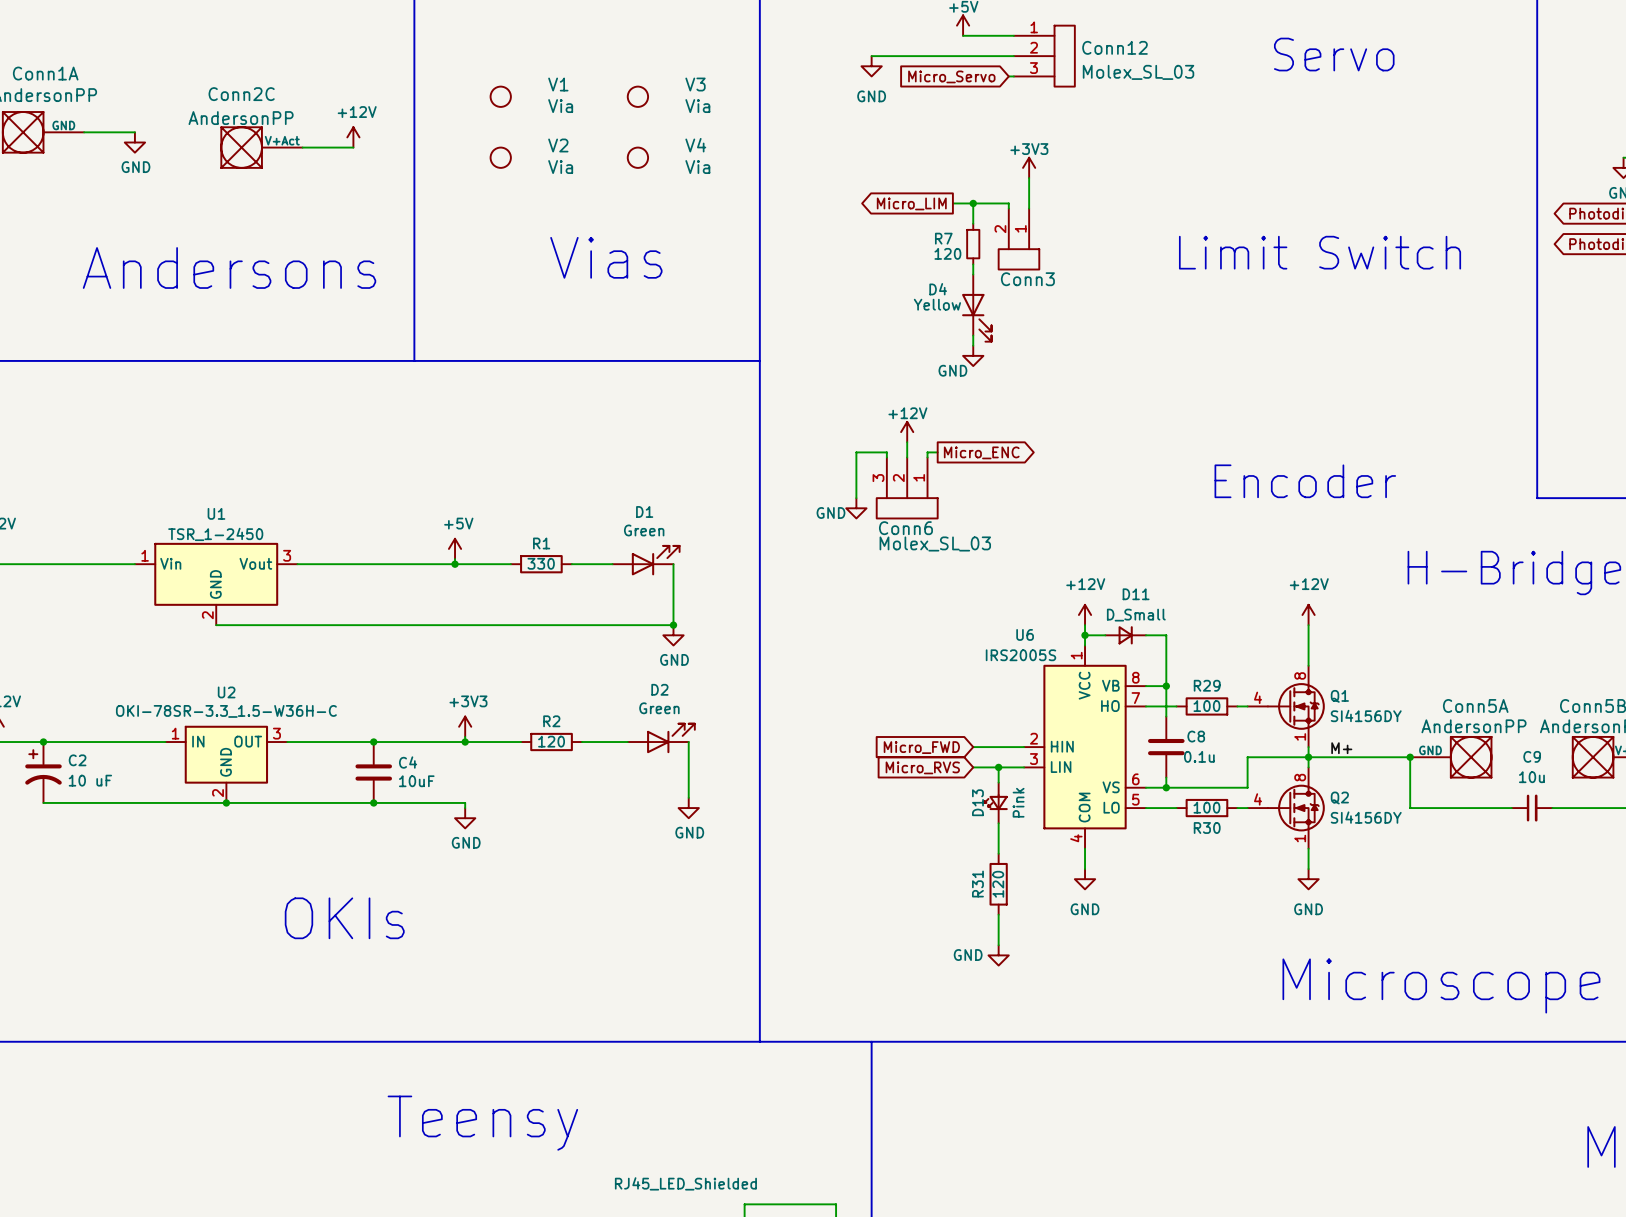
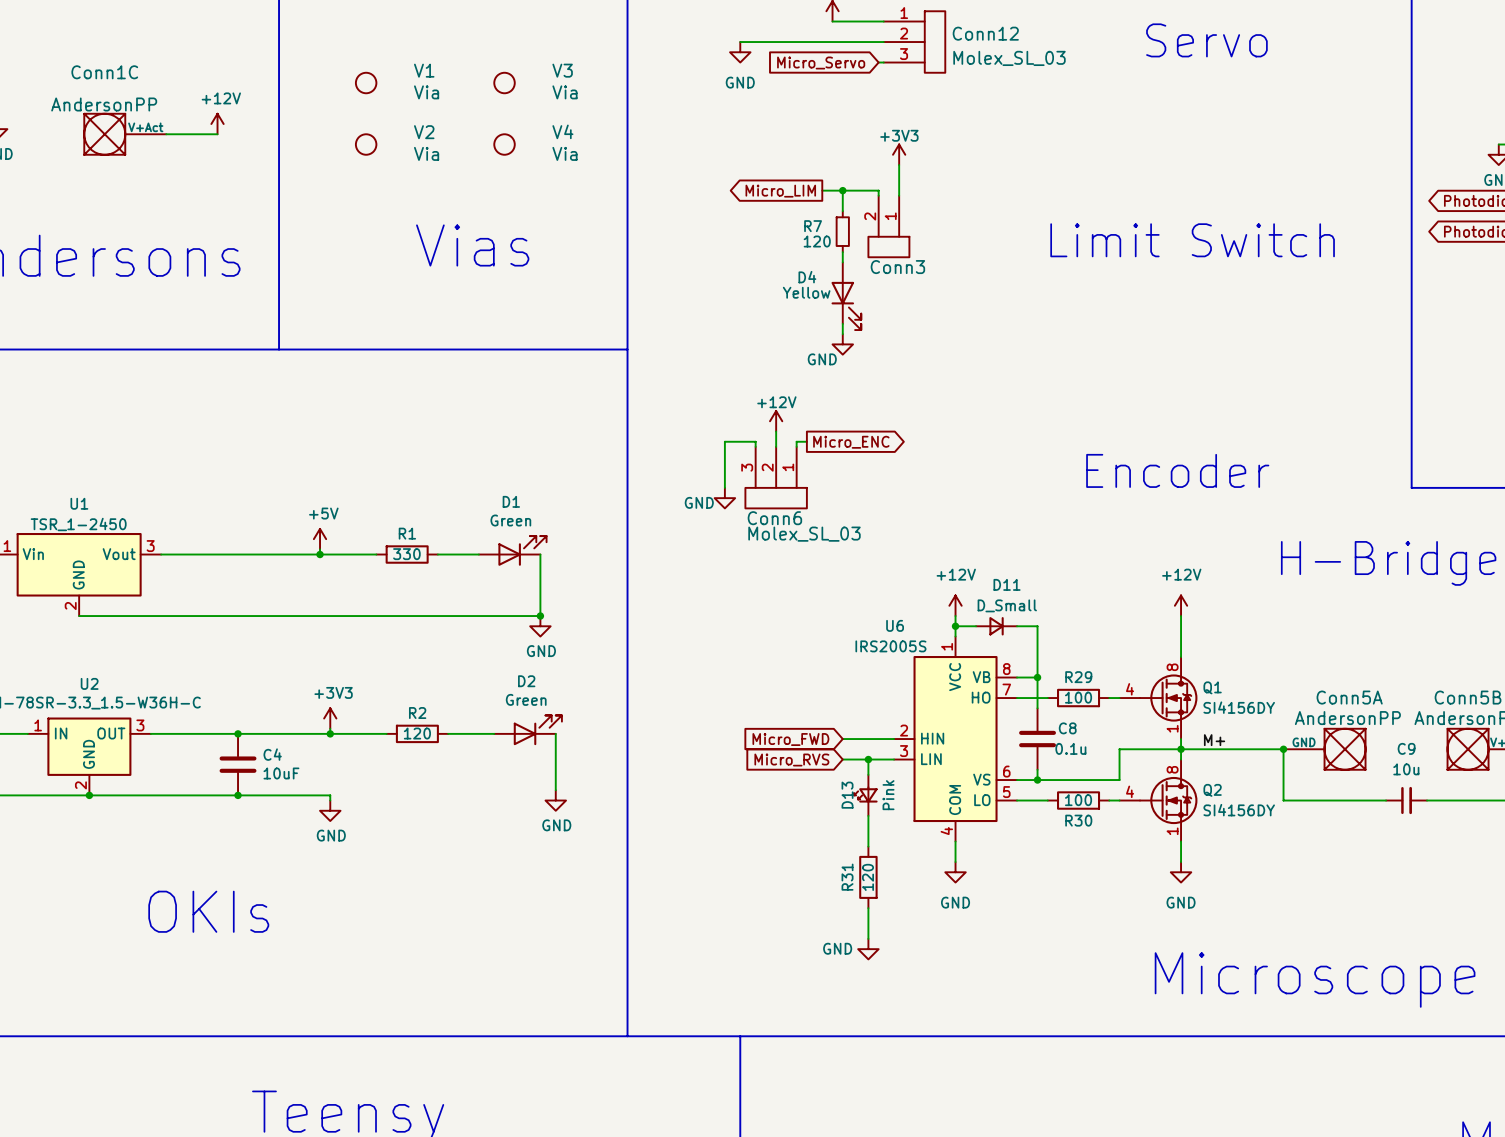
Conn2C name: Conn2C (241, 94) -> Conn1C (104, 72)

